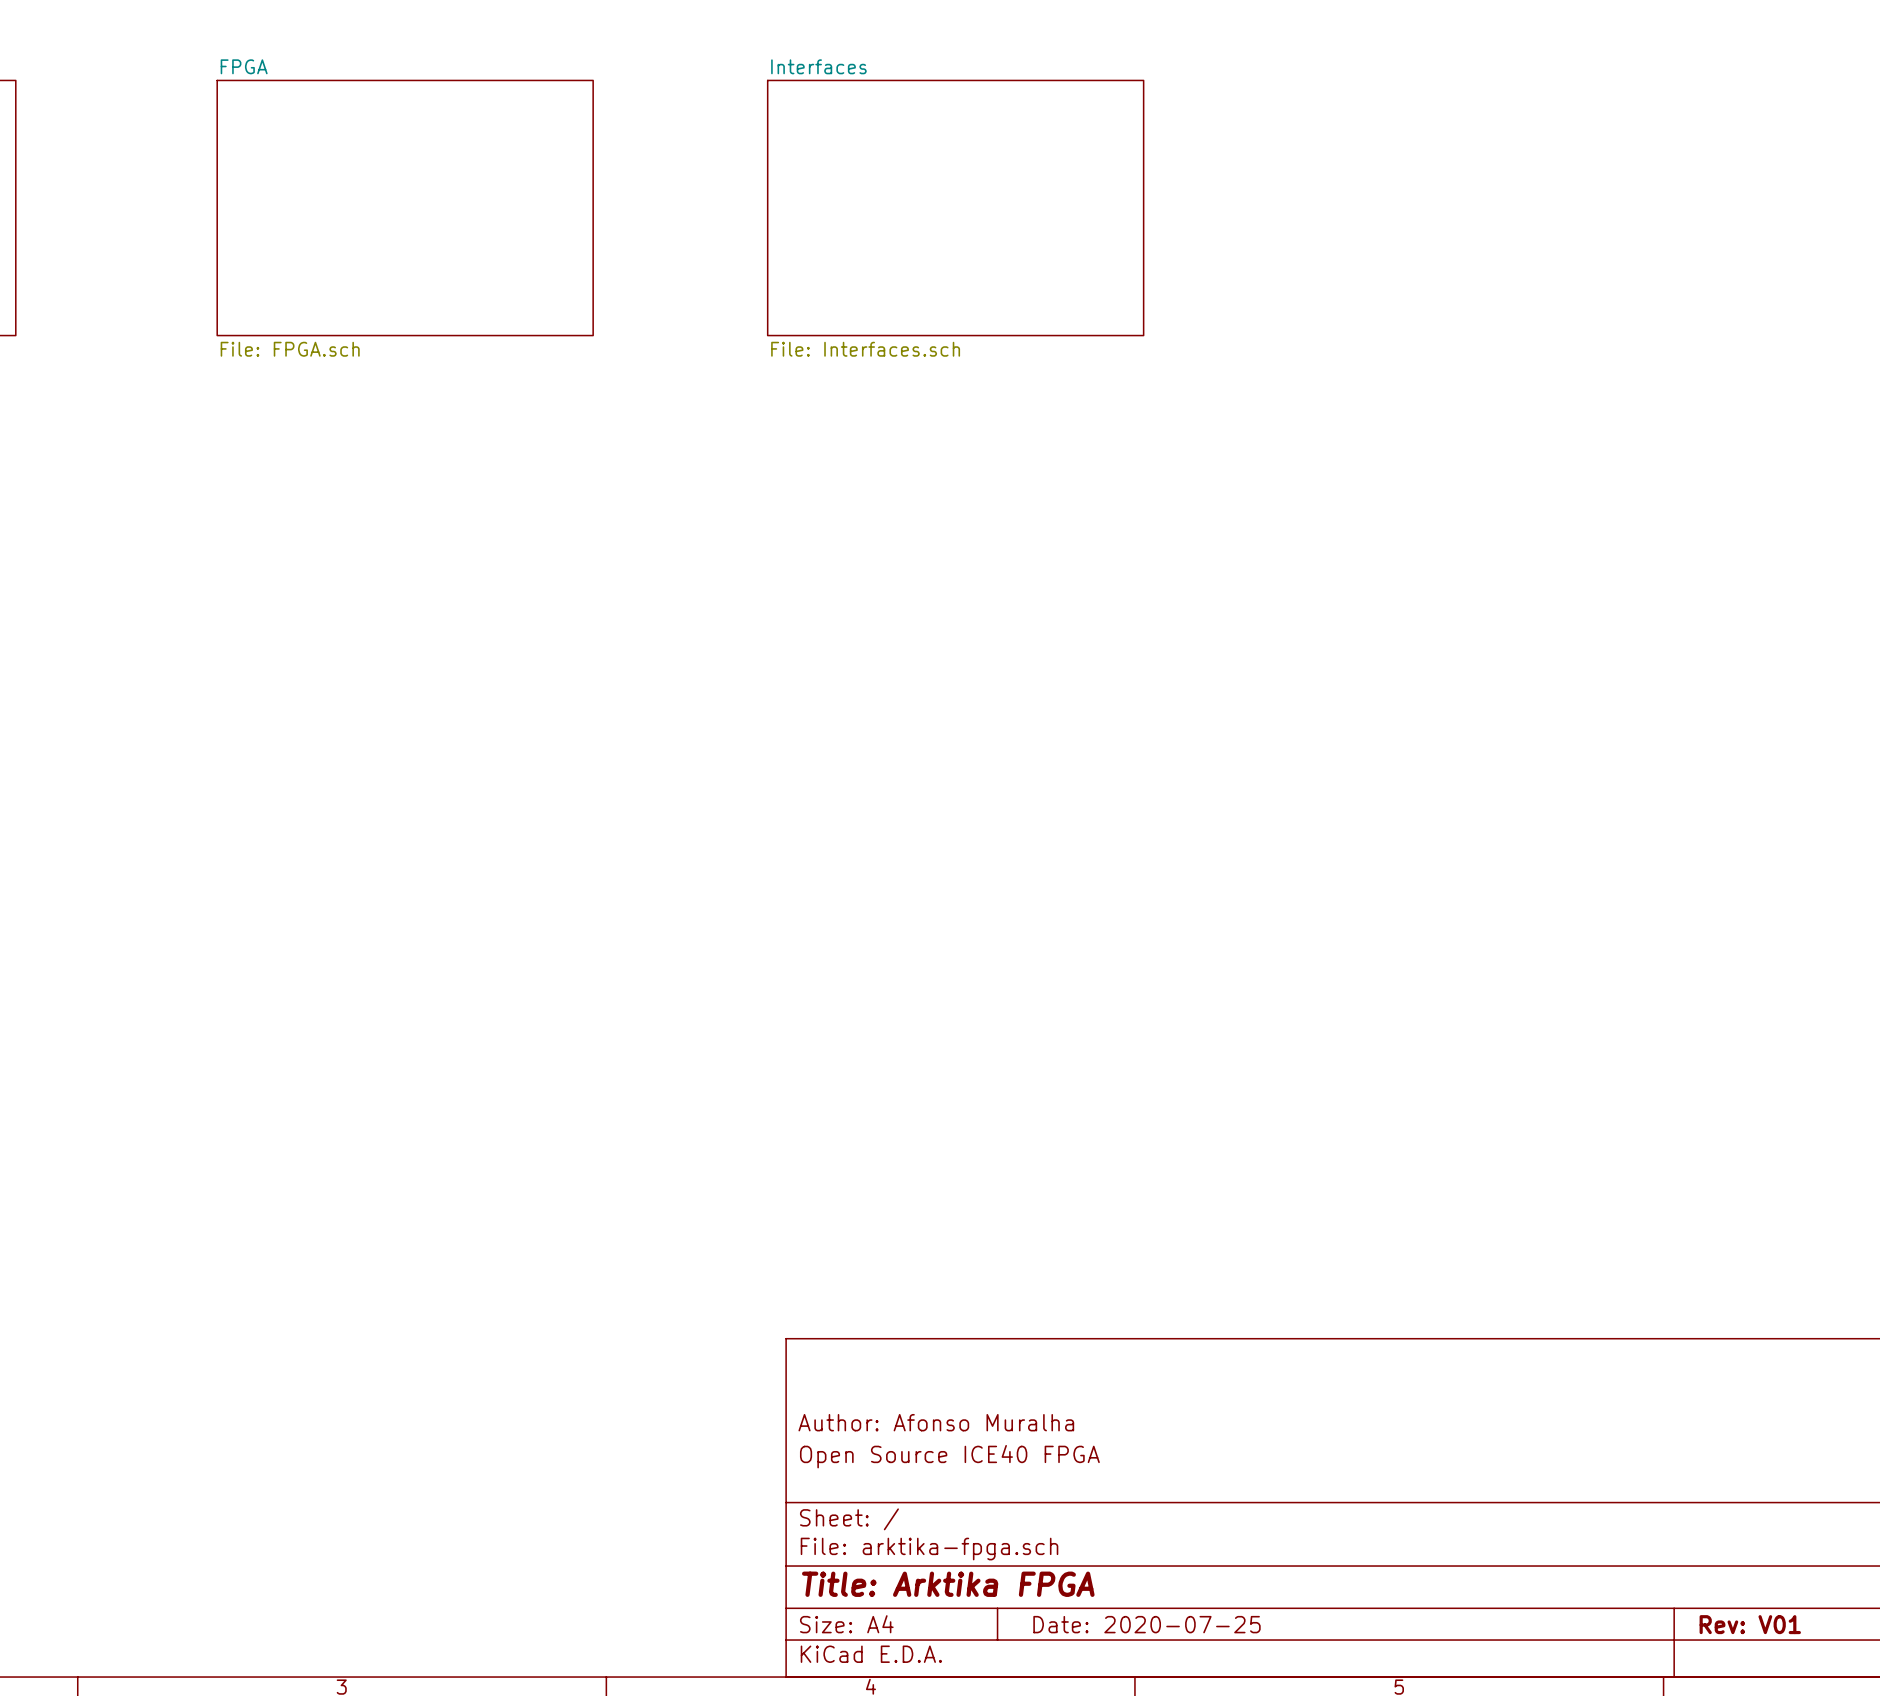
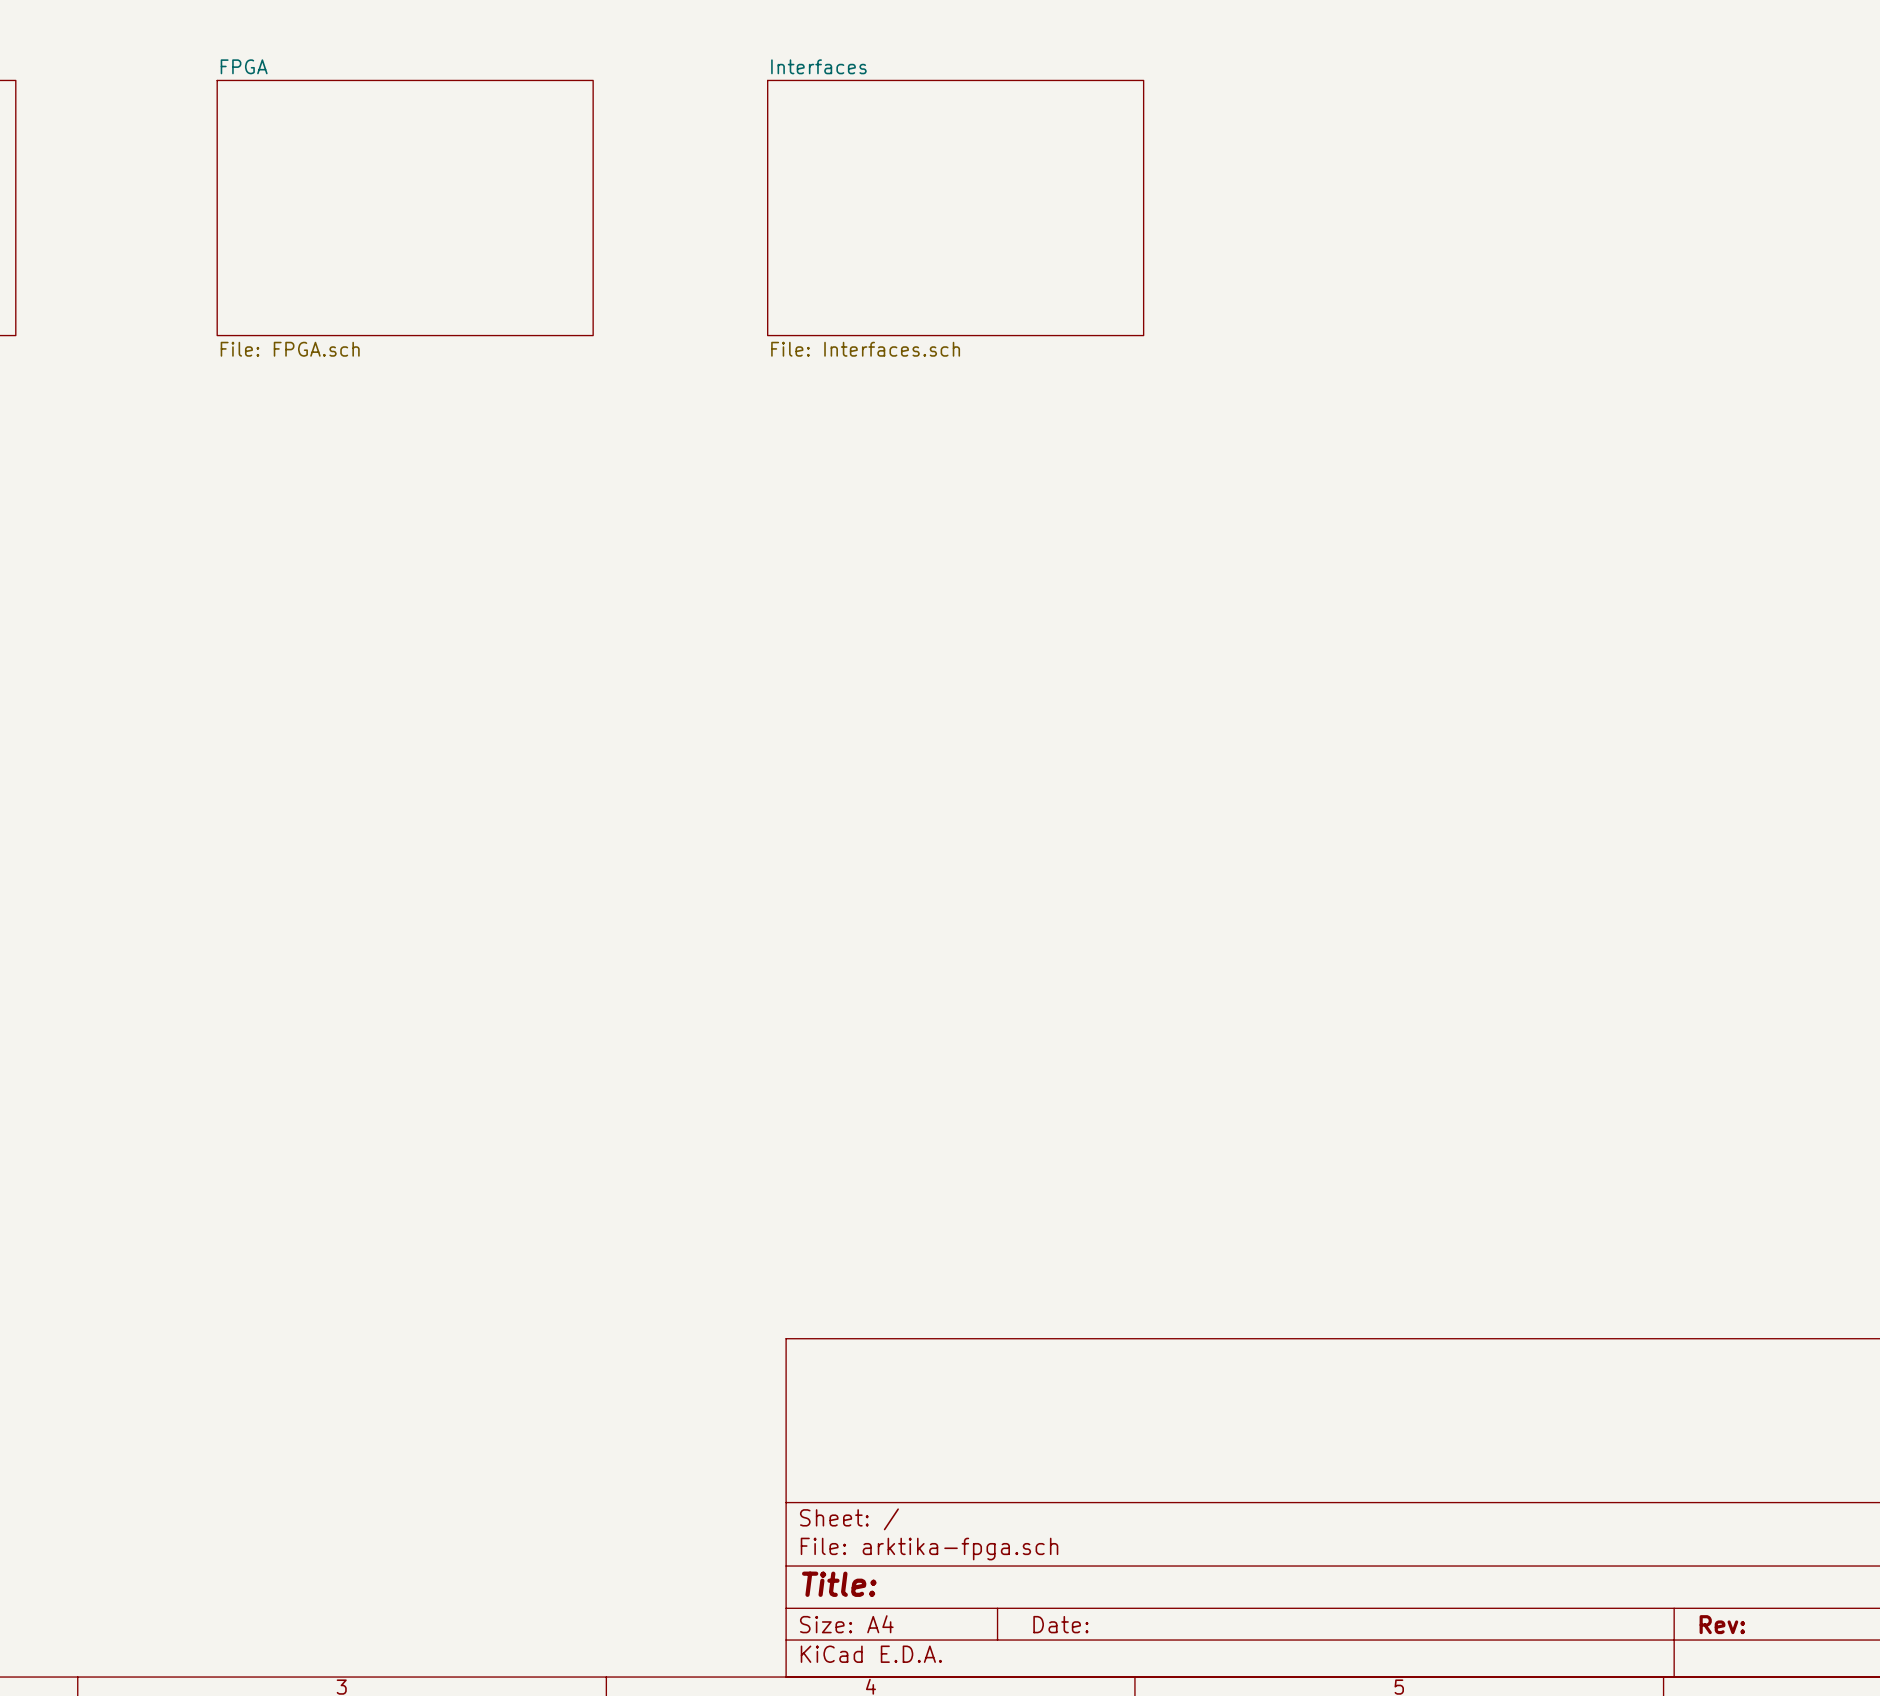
title block: Author: Afonso Muralha (936, 1422) -> none
title block: Open Source ICE40 FPGA (949, 1456) -> none
title block: Title: Arktika FPGA (948, 1584) -> Title: (839, 1584)
title block: Date: 2020-07-25 (1146, 1624) -> Date: (1060, 1624)
title block: Rev: V01 (1750, 1624) -> Rev: (1722, 1624)

